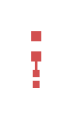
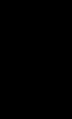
part: (36, 46) -> none
top track: (36, 56) (36, 73) -> none
part: (36, 78) -> none

